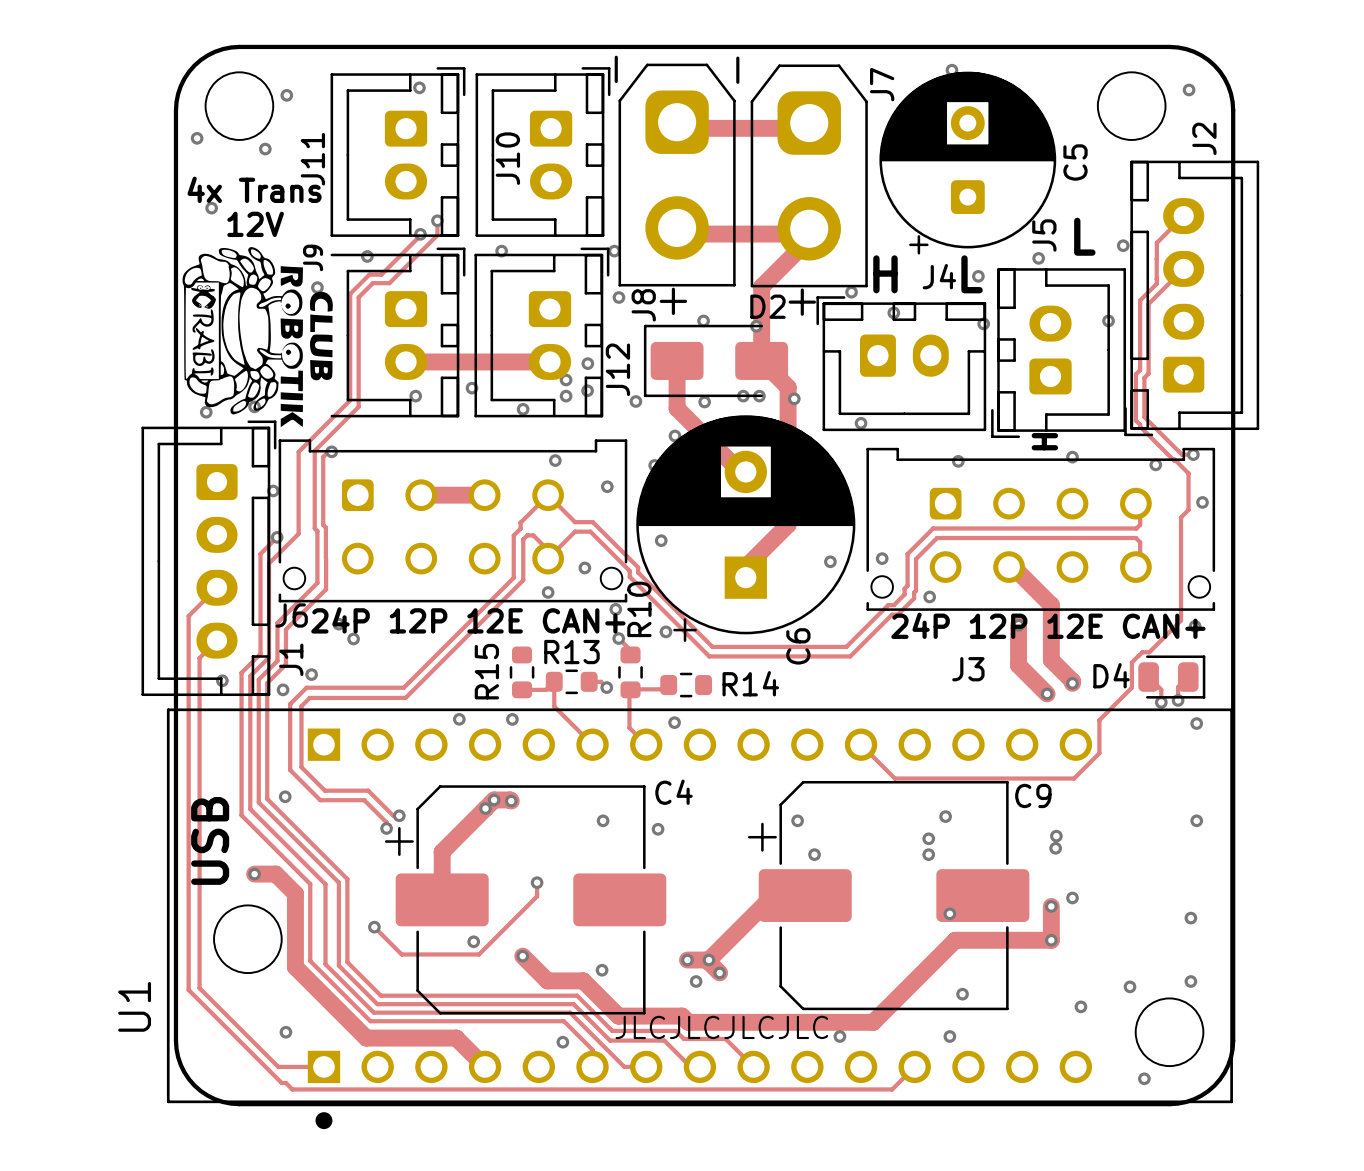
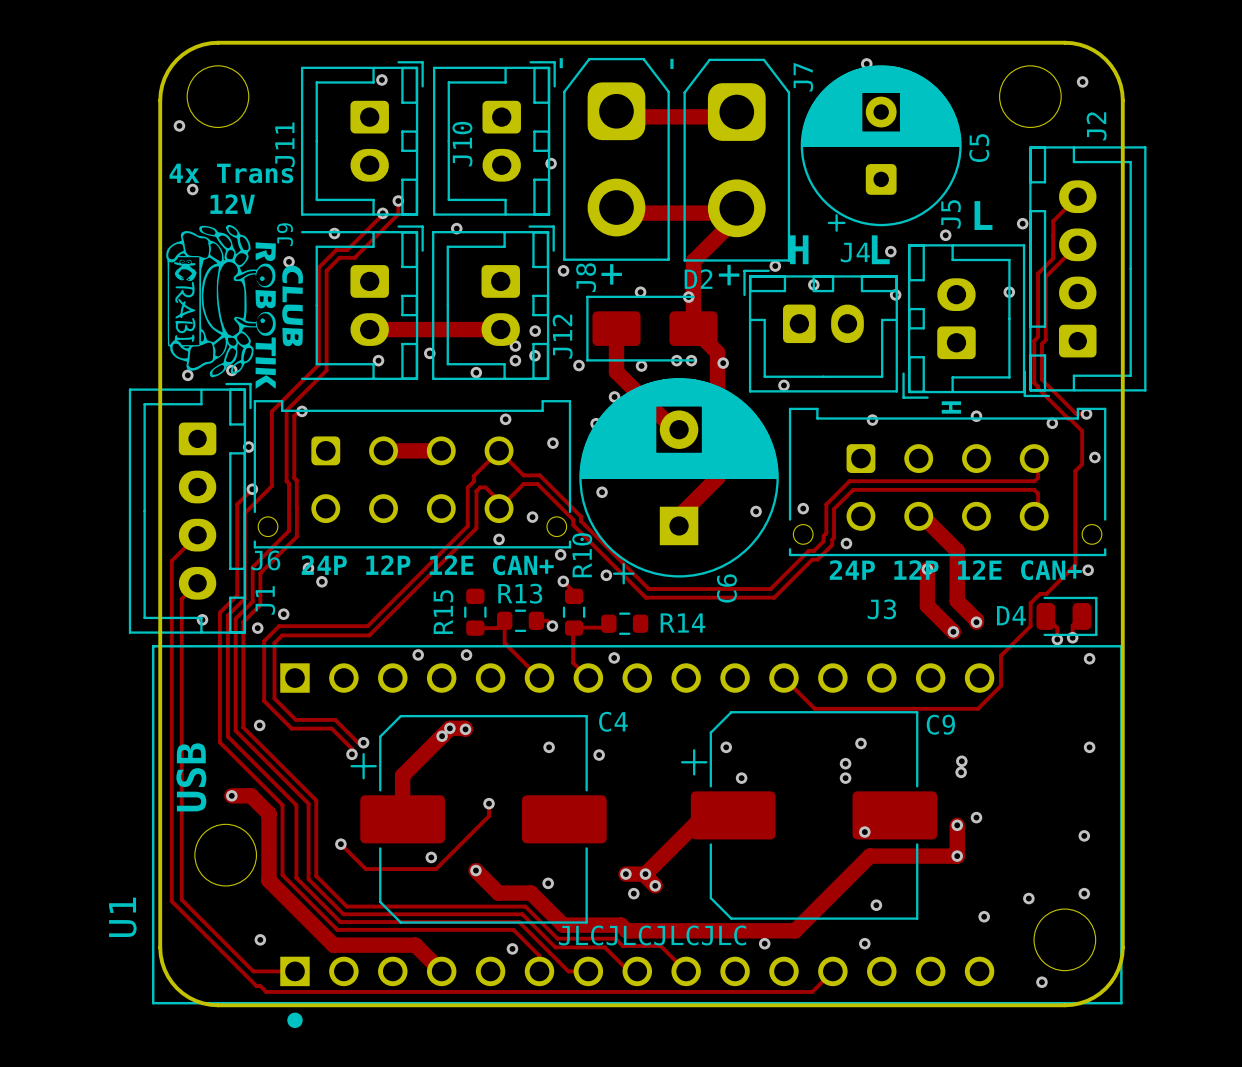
via: (286, 95) -> none
via: (265, 149) -> none
via position: (614, 251) -> (551, 163)

